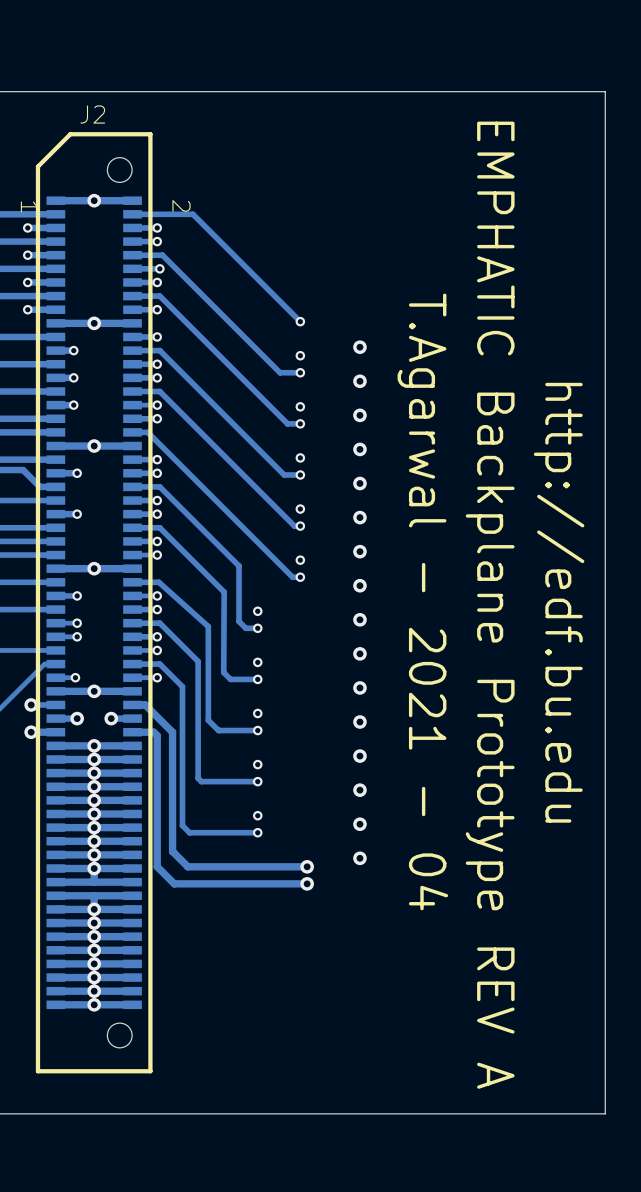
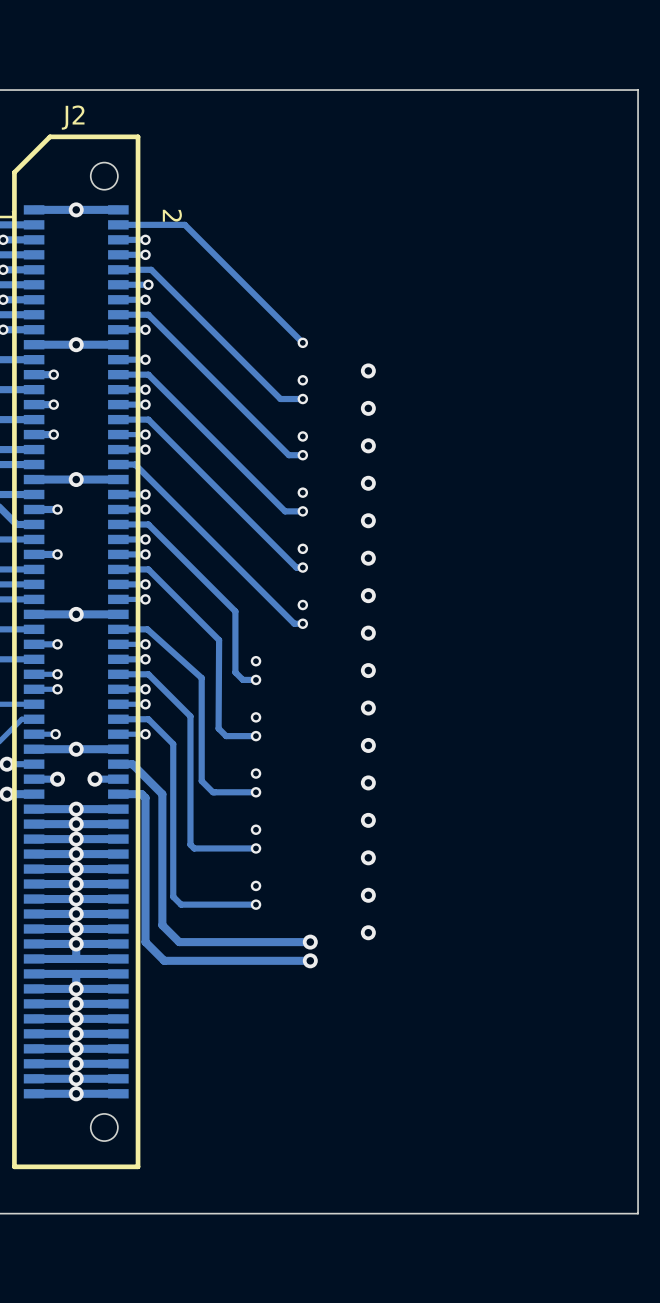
text: T.Agarwal - 2021 - 04 (422, 601) -> none
text: http://edf.bu.edu (559, 602) -> none
text: EMPHATIC Backplane Prototype REV A (490, 605) -> none

